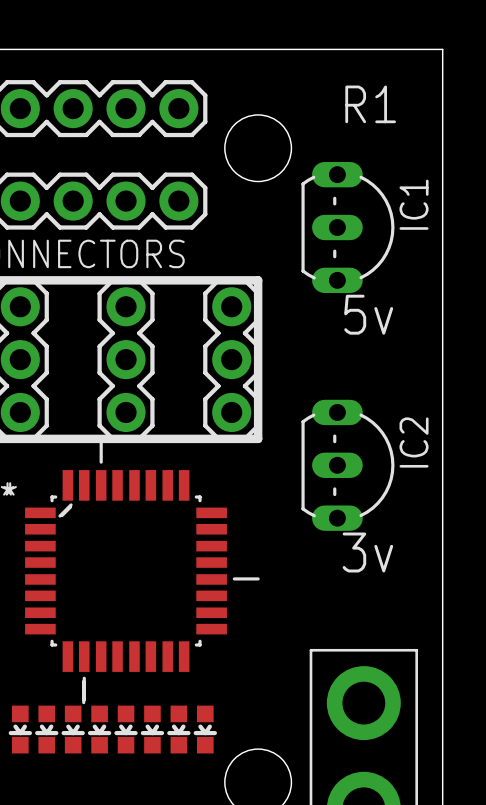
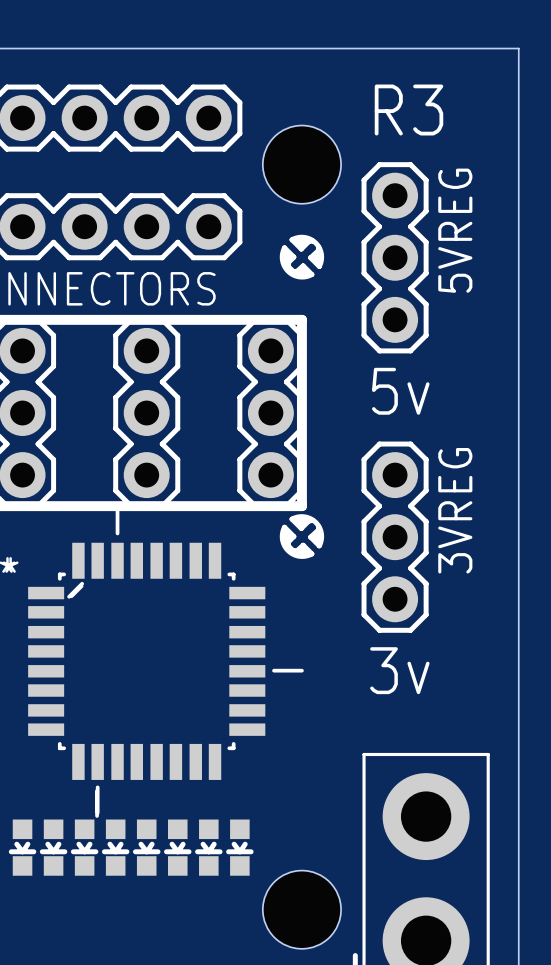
text: none -> R3 (408, 110)
text: R1 (370, 104) -> none
drawing: none -> [279, 234, 325, 280]
5VREG: none -> (395, 257)
IC1: (347, 227) -> none
text position: 5v (368, 314) -> 5v (400, 391)
drawing: none -> [279, 514, 325, 559]
3VREG: none -> (395, 537)
IC2: (347, 465) -> none
text position: 3v (367, 552) -> 3v (399, 670)

